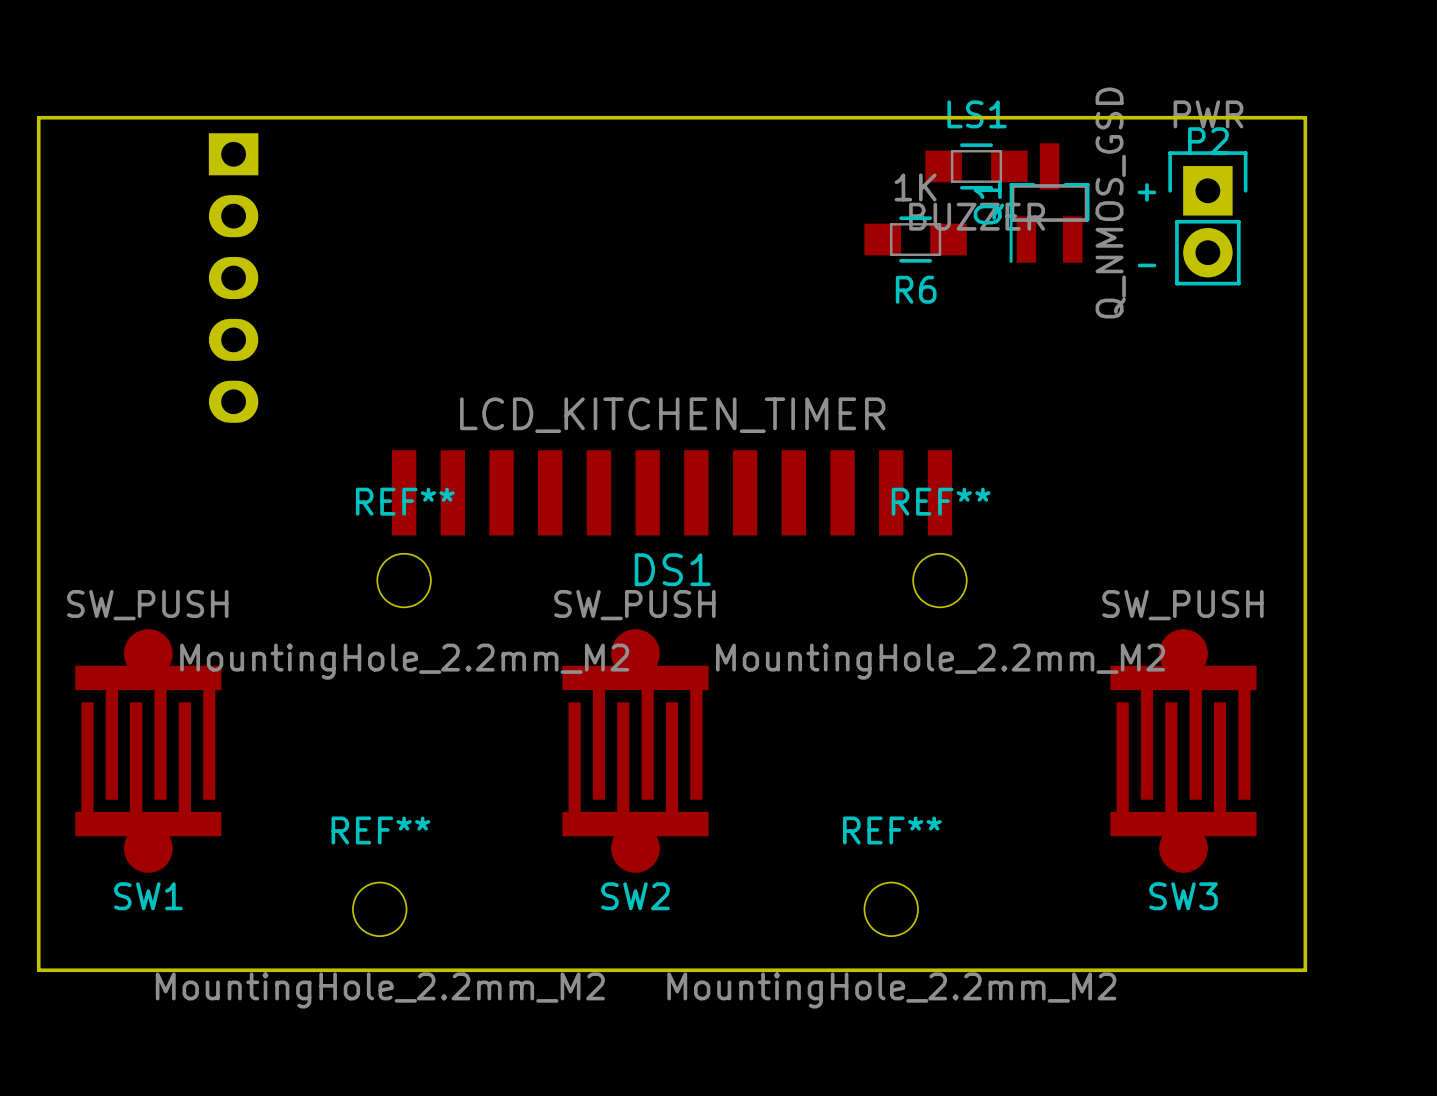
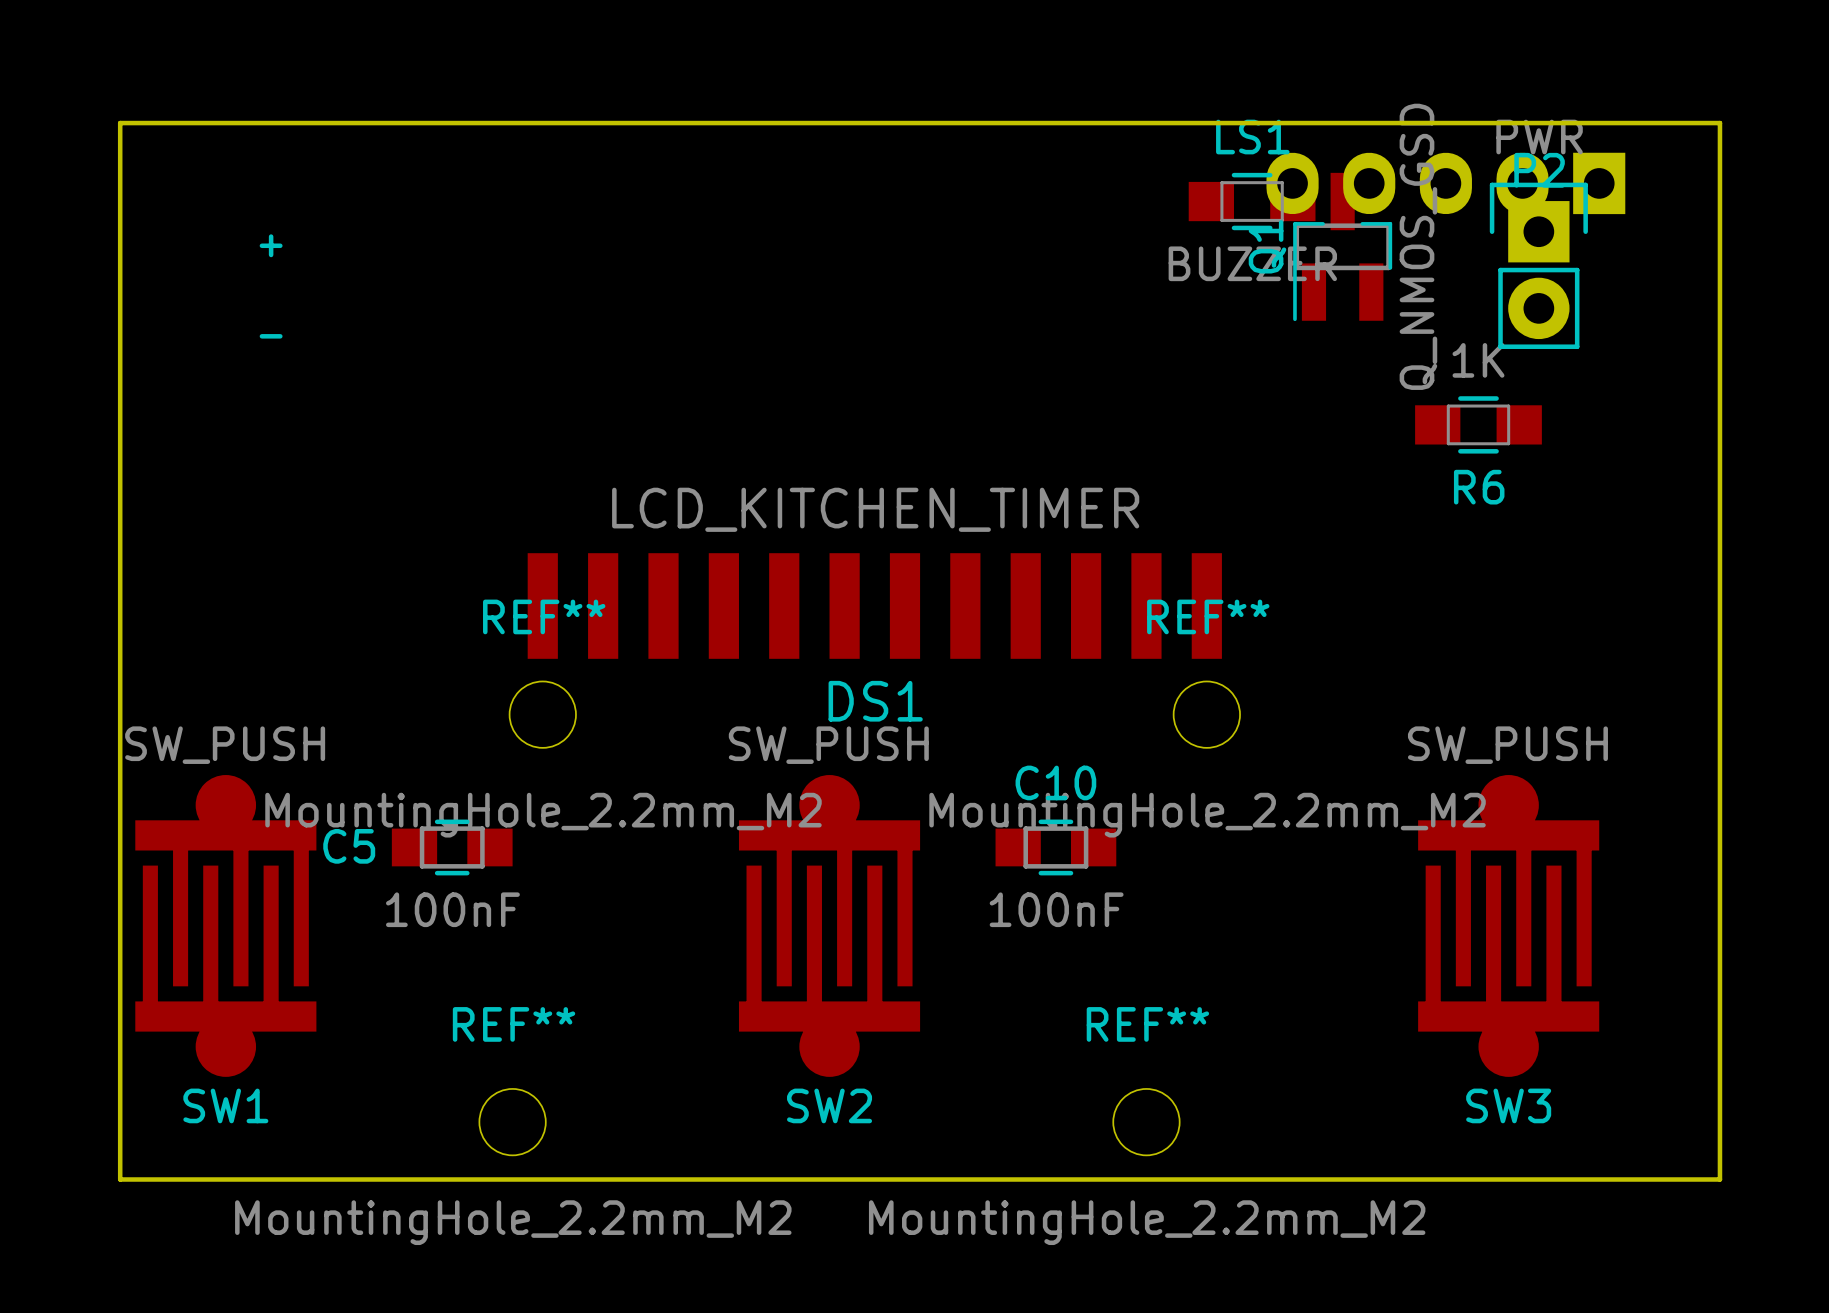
board edge: (38, 117) (1305, 117) (1305, 970) (38, 970) (38, 117) -> (120, 123) (120, 1179) (1719, 1179) (1719, 123) (120, 123)
part: none -> (1445, 183)
text: + (1146, 192) -> none
text: none -> + (271, 245)
R6 position: (915, 239) -> (1478, 424)
text: - (1146, 265) -> none
text: none -> - (271, 336)
part: (233, 278) -> none
C5: none -> 100nF (452, 847)
C10: none -> 100nF (1055, 847)

